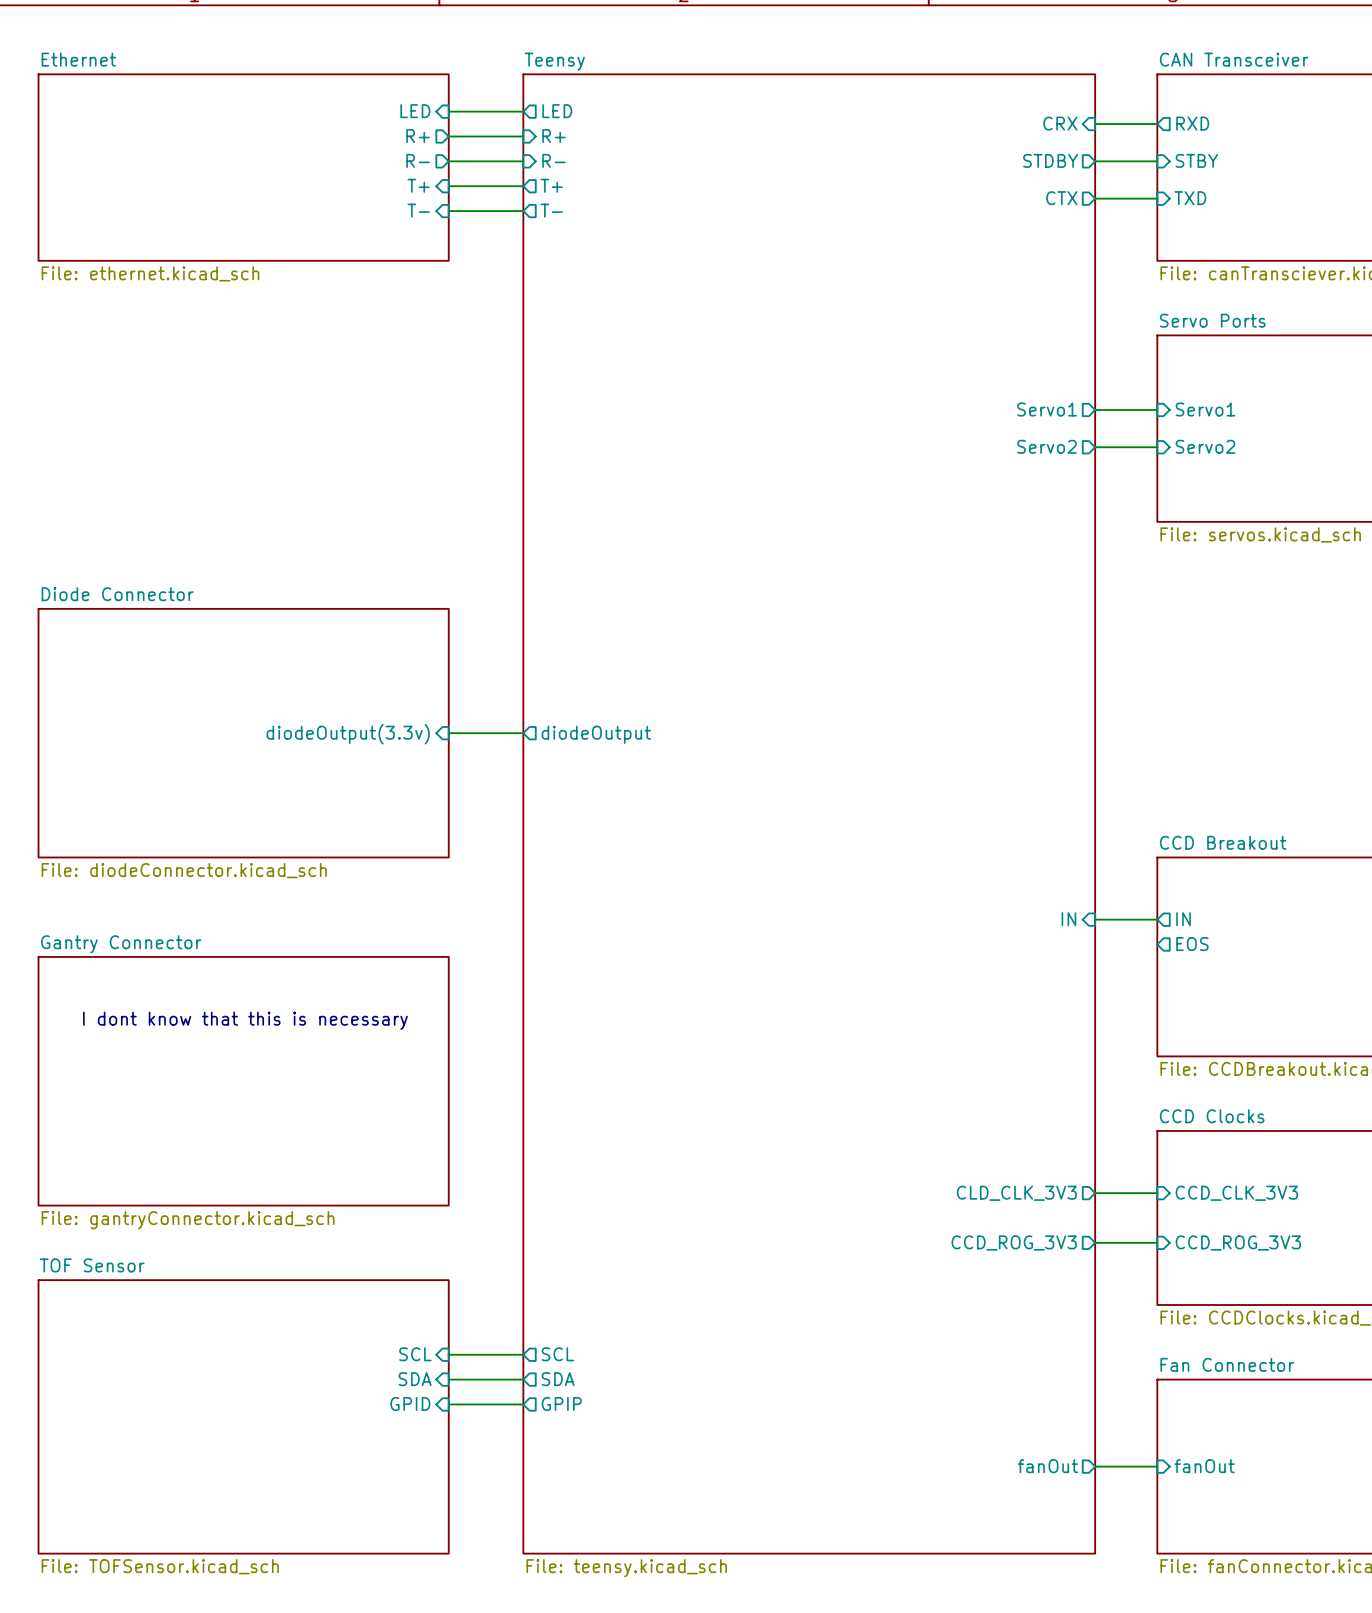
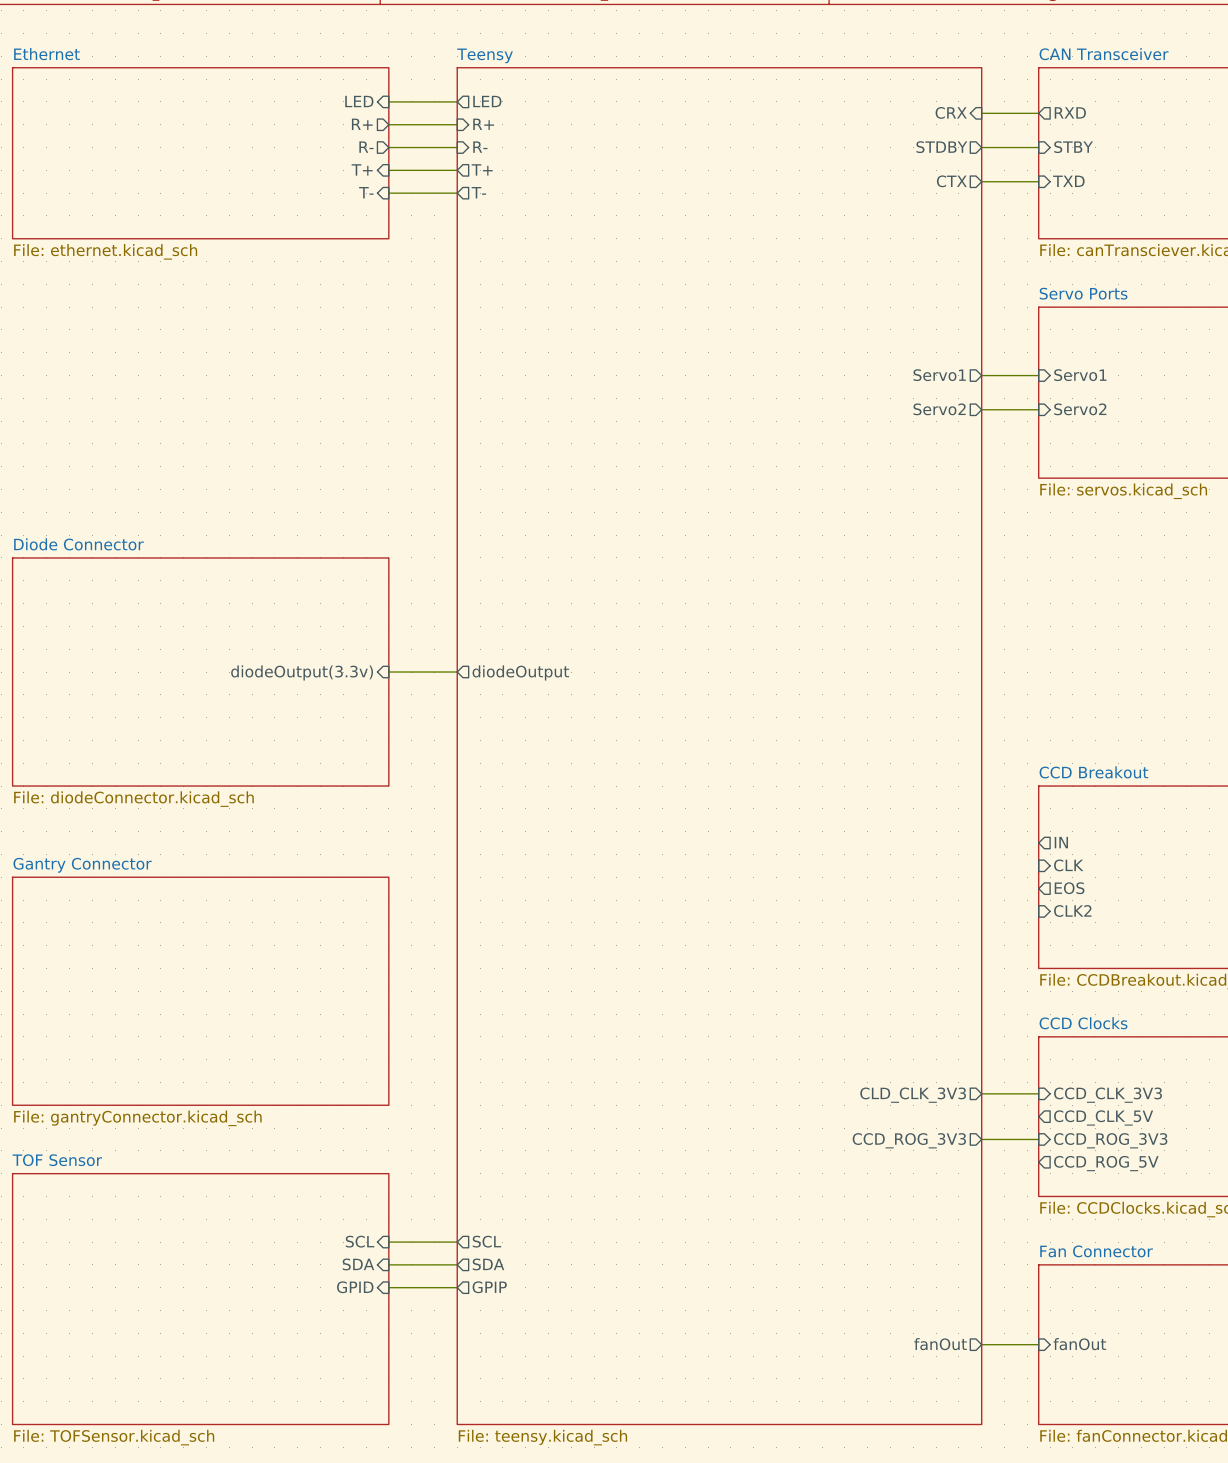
sheet pin: IN (1068, 919) -> none
wire: (1095, 919) (1157, 919) -> none
sheet pin shape: output (1192, 944) -> input (1068, 865)
sheet pin: EOS (1192, 944) -> CLK (1068, 865)
sheet pin: none -> EOS (1069, 888)
sheet pin: none -> CLK2 (1072, 911)
text: I dont know that this is necessary (245, 1020) -> none
sheet pin: none -> CCD_CLK_5V (1103, 1117)
sheet pin: none -> CCD_ROG_5V (1106, 1163)

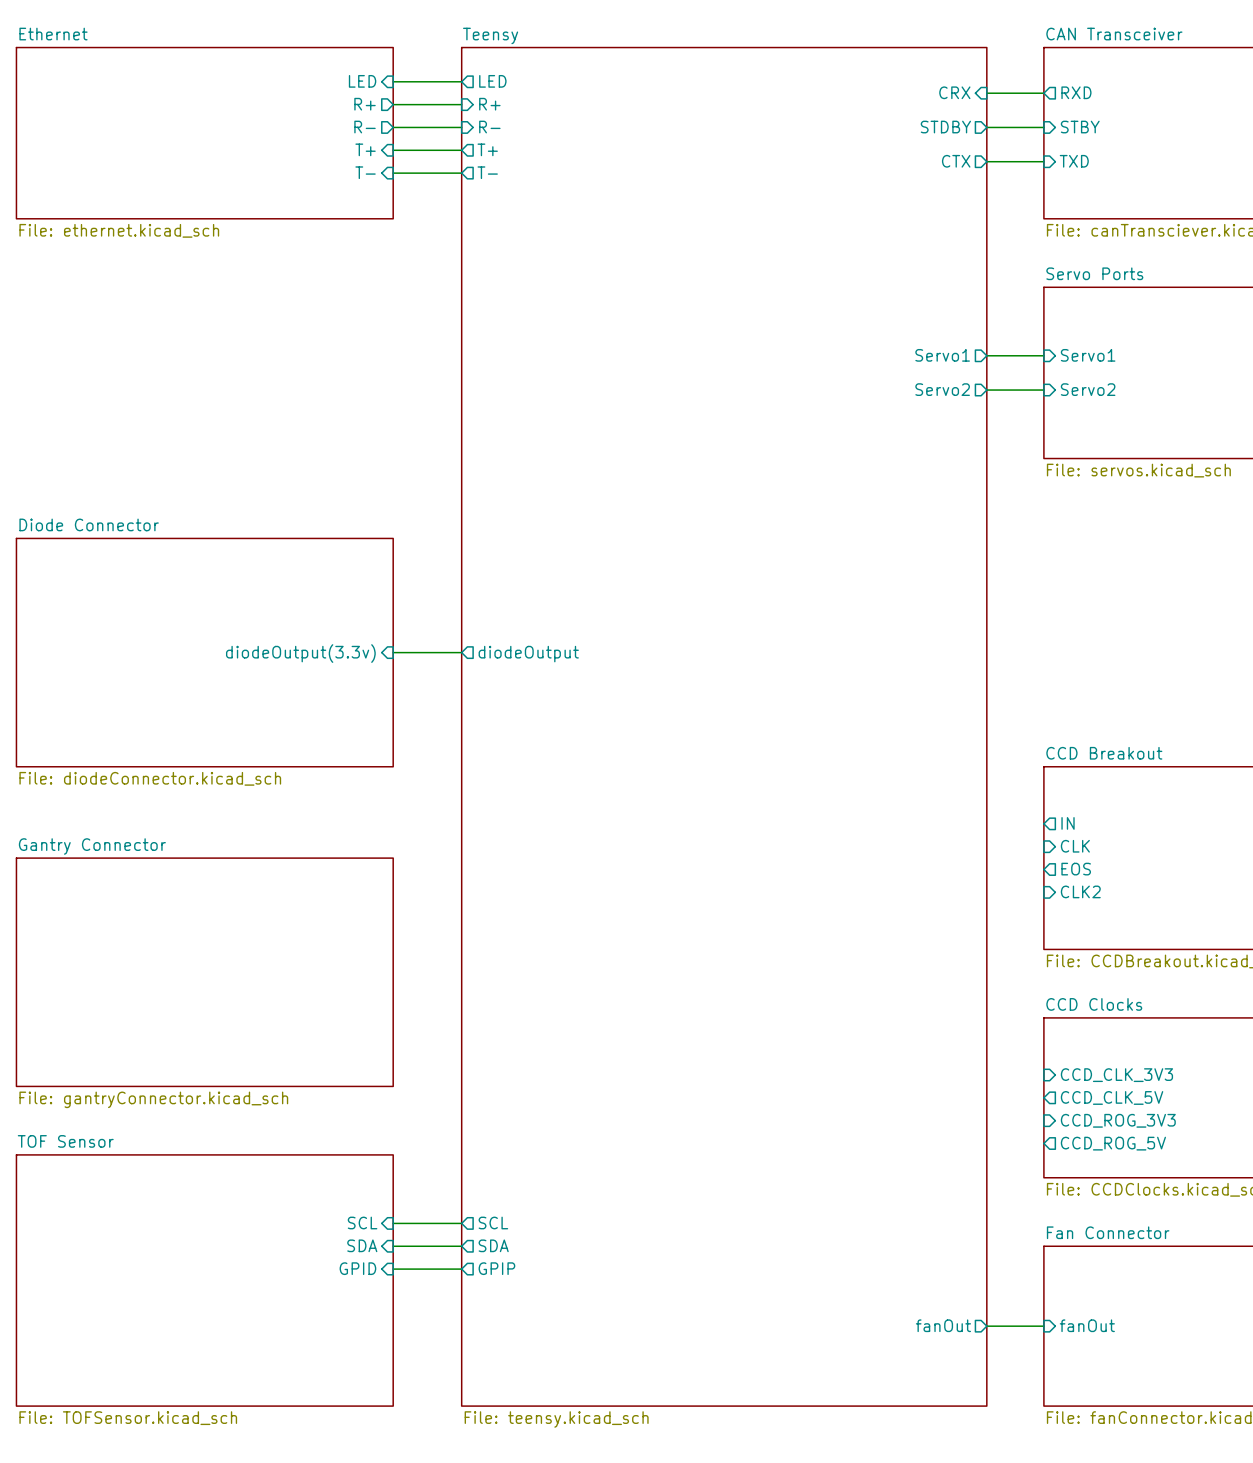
wire: (981, 1093) (1038, 1093) -> none
sheet pin: CLD_CLK_3V3 (913, 1095) -> none
wire: (981, 1139) (1038, 1139) -> none
sheet pin: CCD_ROG_3V3 (909, 1140) -> none

